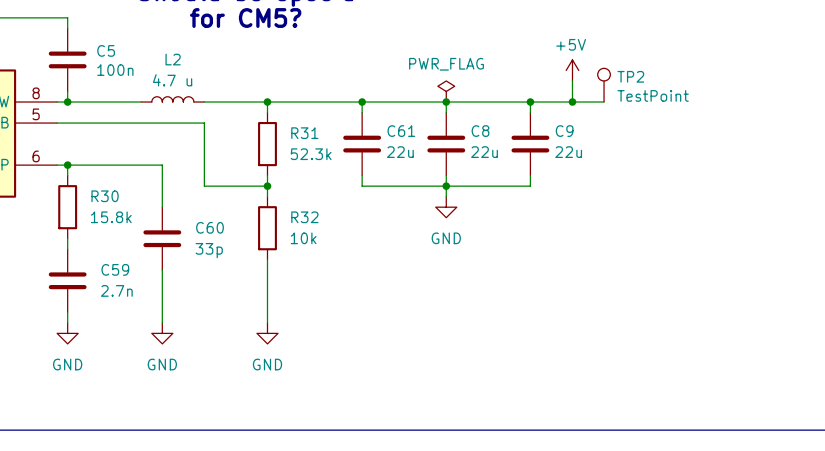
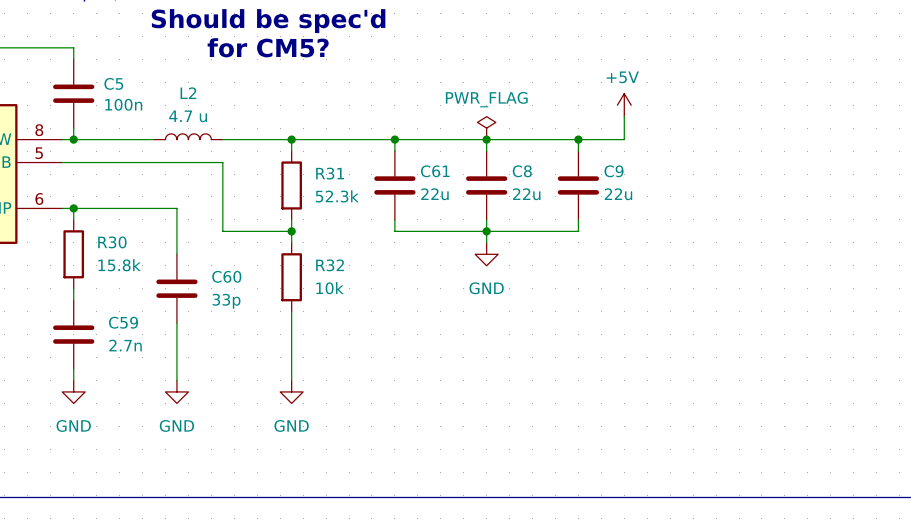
TP2: TestPoint (604, 85) -> none
wire: (572, 102) (604, 102) -> none
junction: (572, 102) -> none

